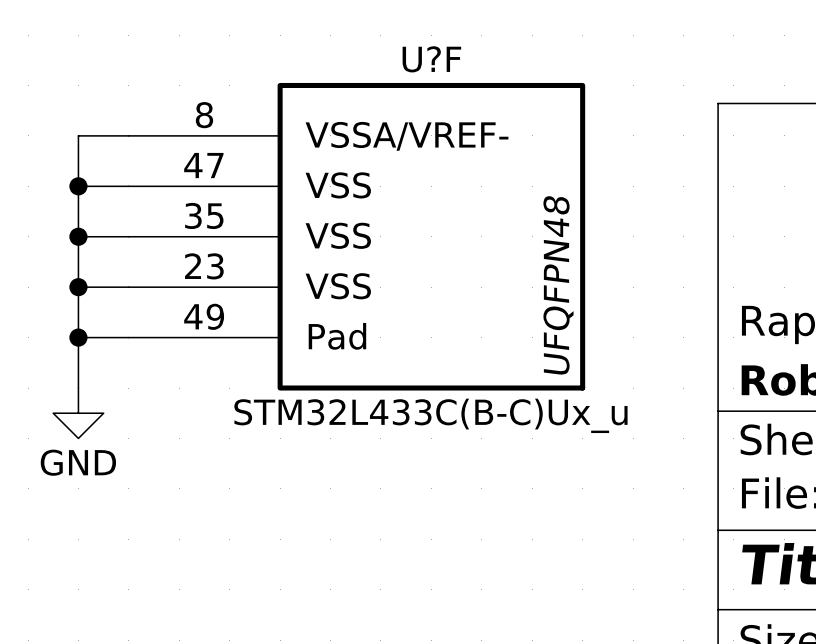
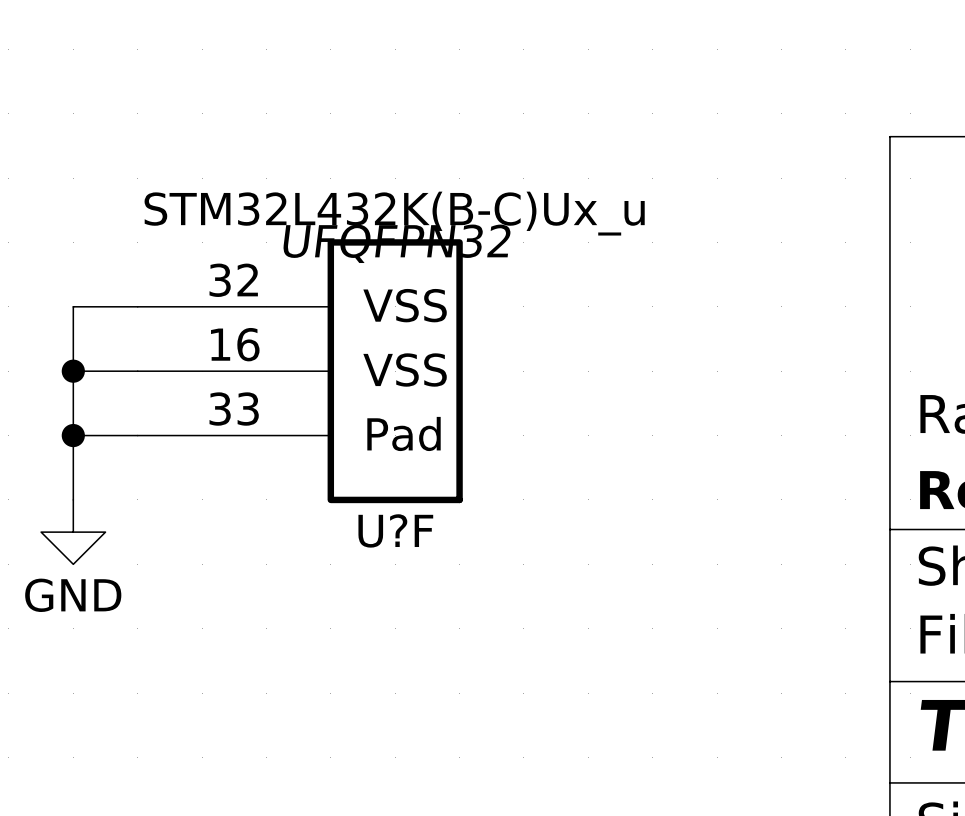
wire: (128, 135) (78, 135) (78, 236) -> none
wire: (78, 186) (128, 186) -> none
junction: (78, 186) -> none
junction: (78, 236) -> none
U?F: STM32L433C(B-C)Ux_u (357, 236) -> none
U?F: none -> STM32L432K(B-C)Ux_u (300, 371)

